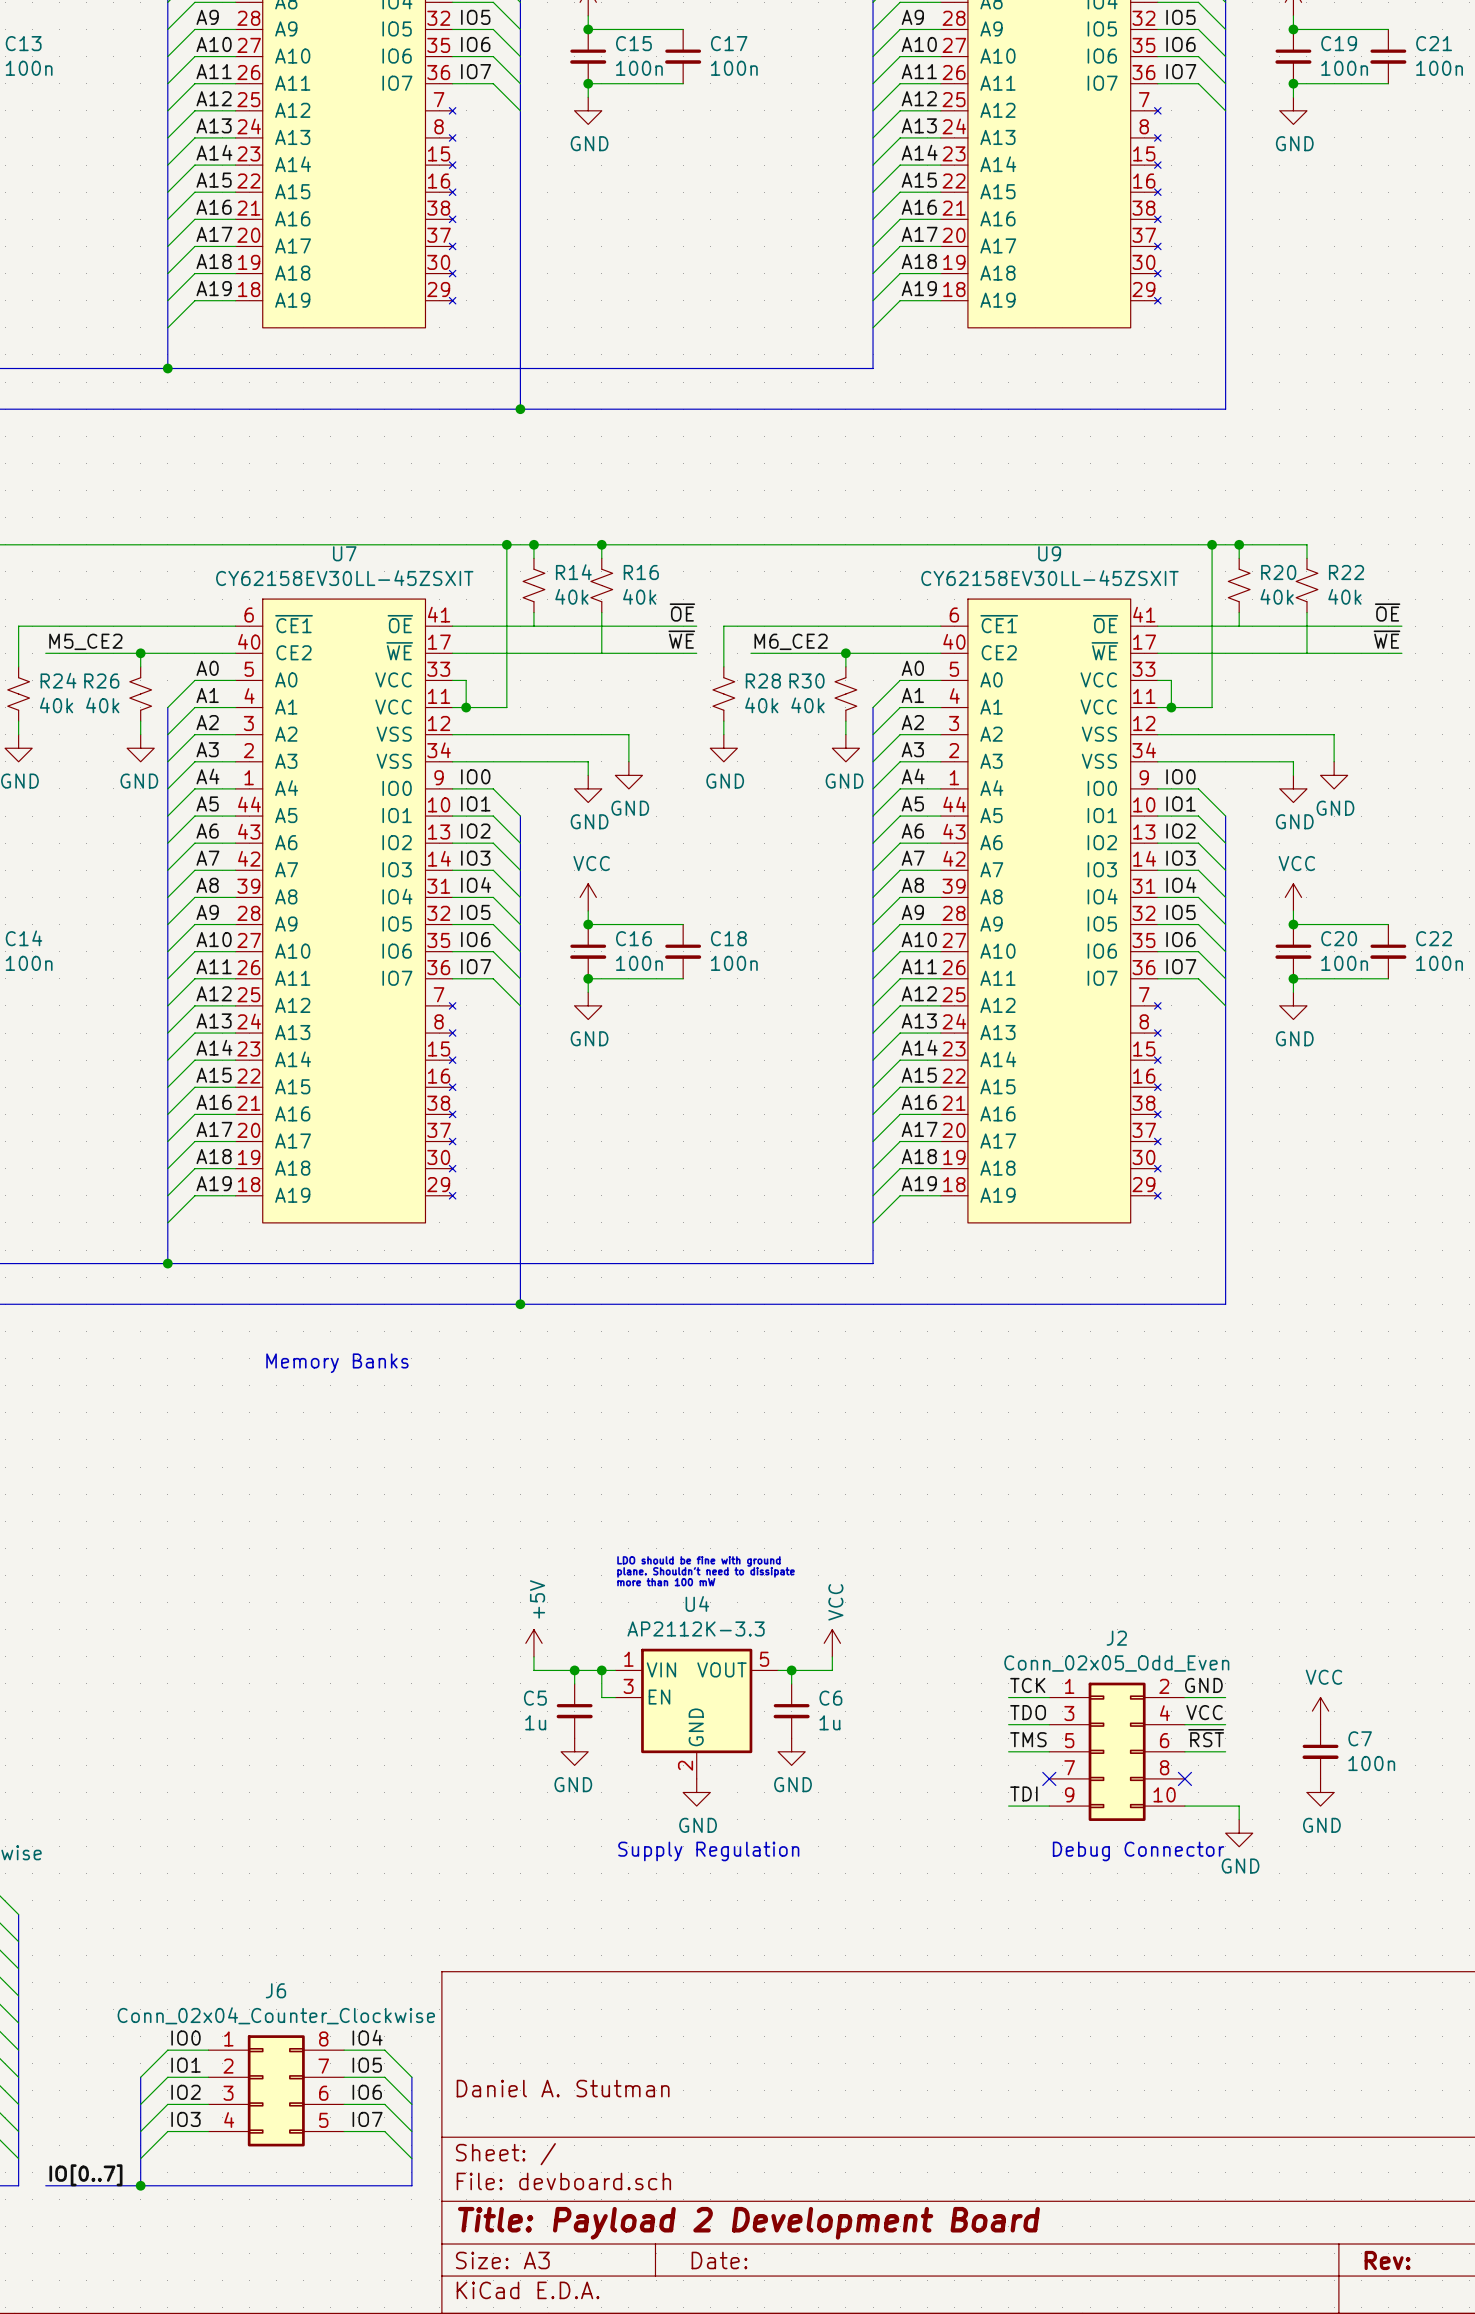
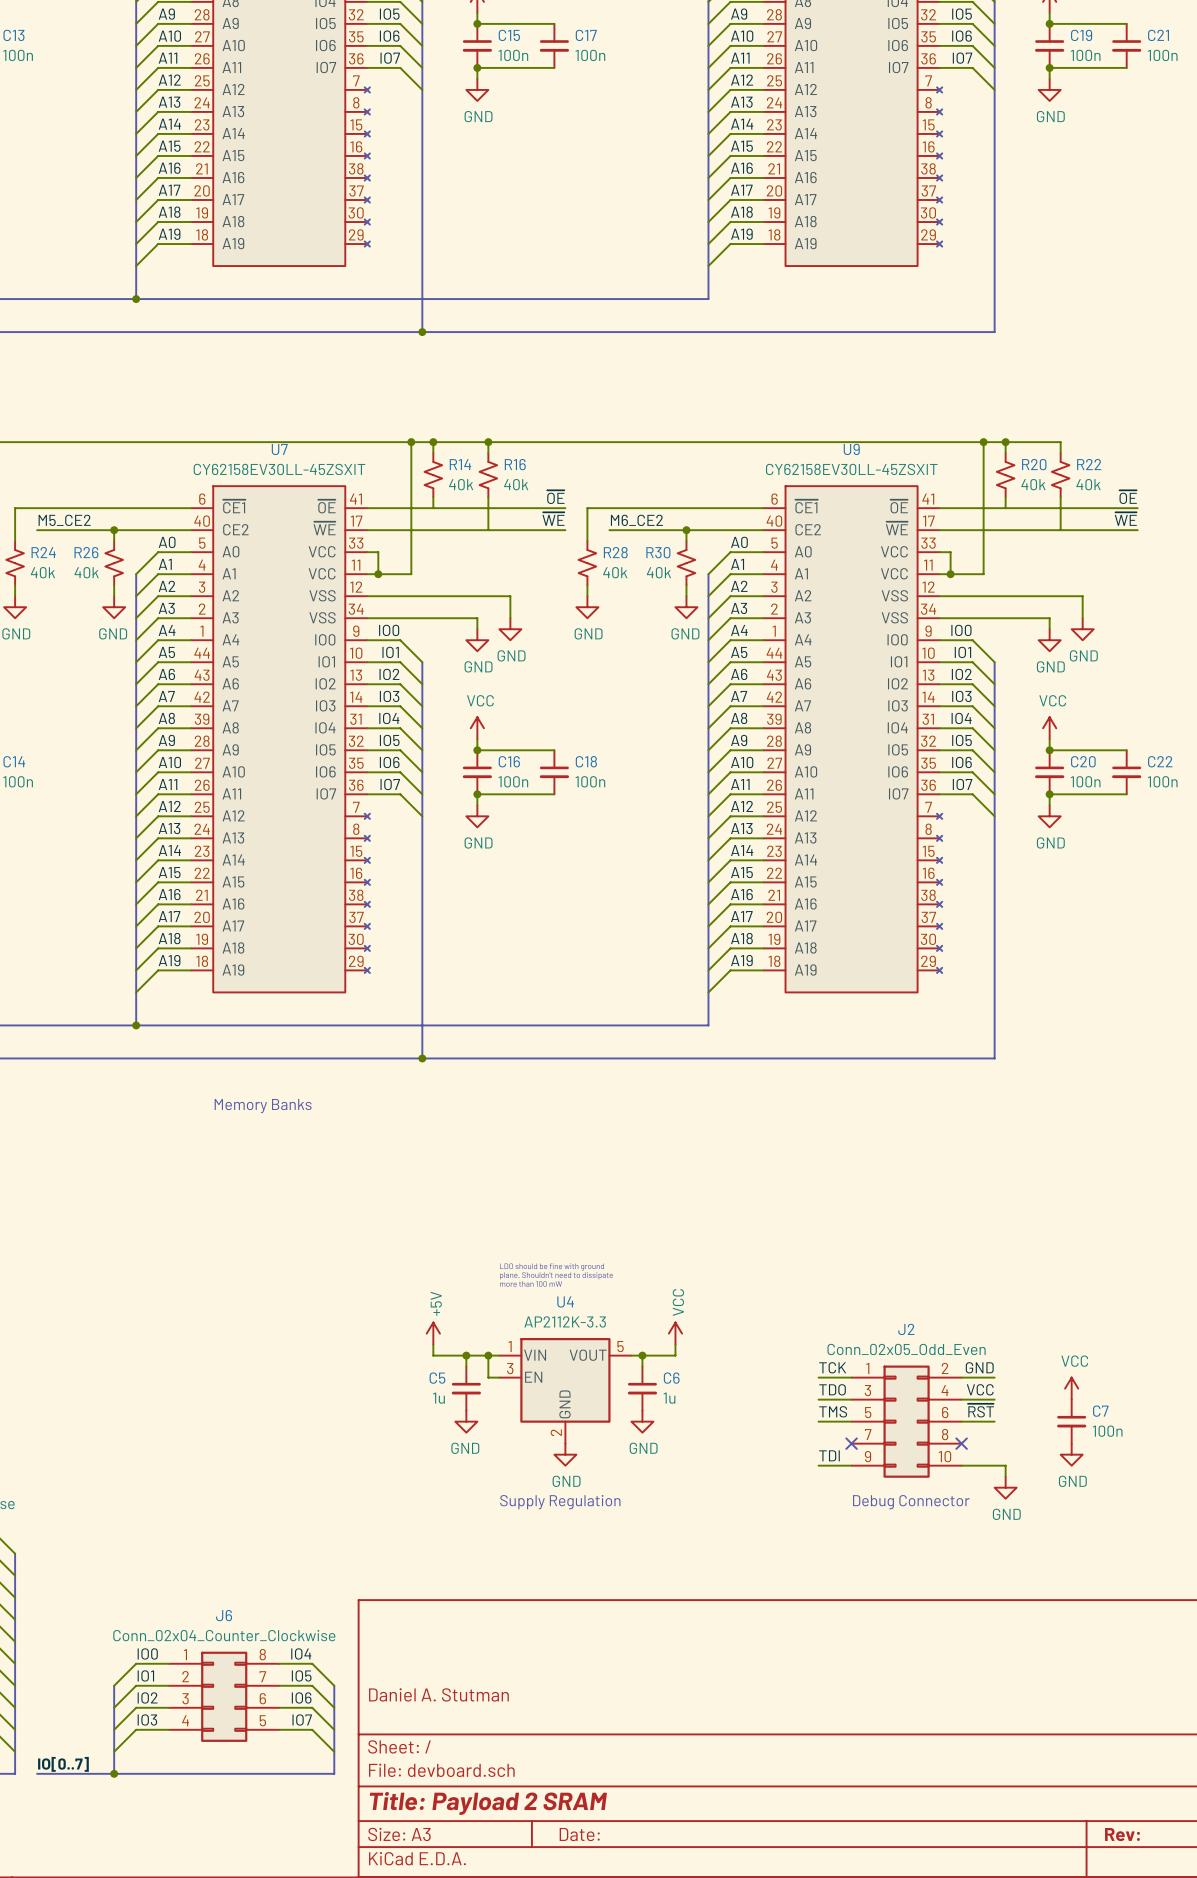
title block: Title: Payload 2 Development Board (748, 2223) -> Title: Payload 2 SRAM (488, 1803)

